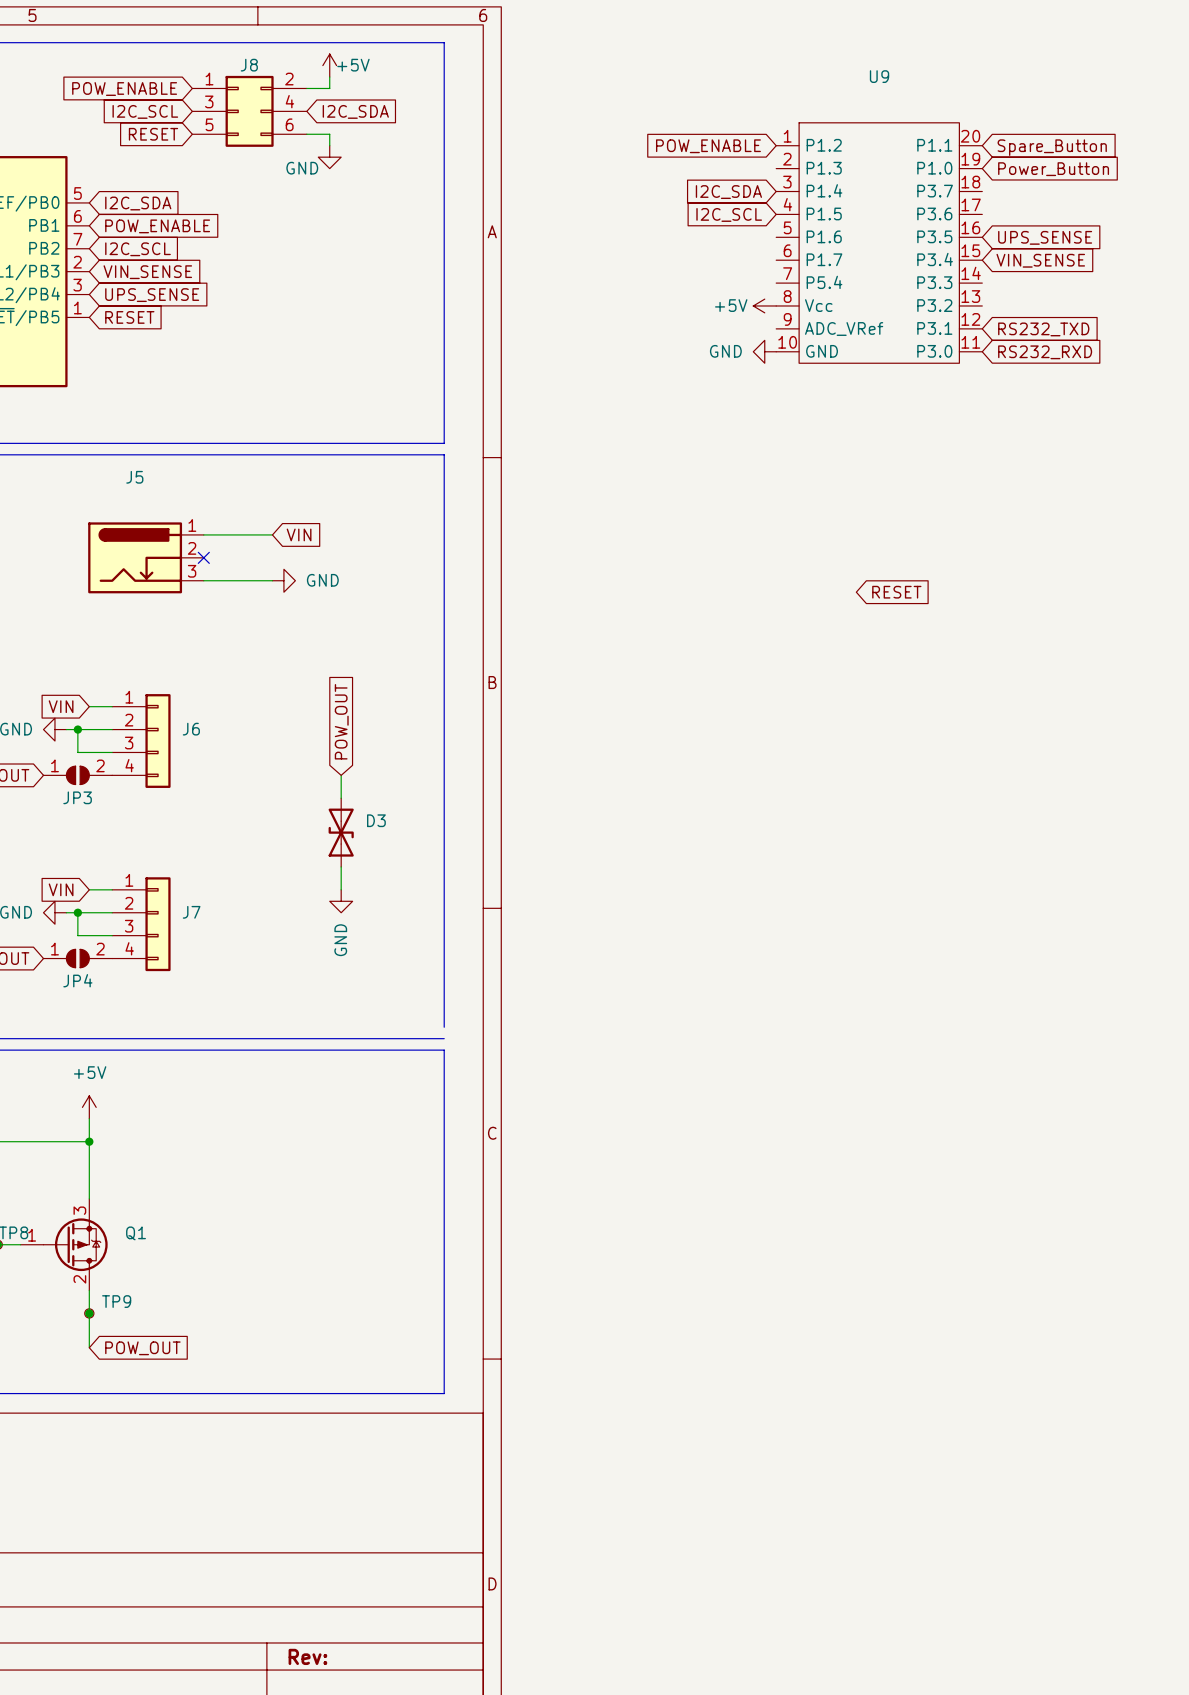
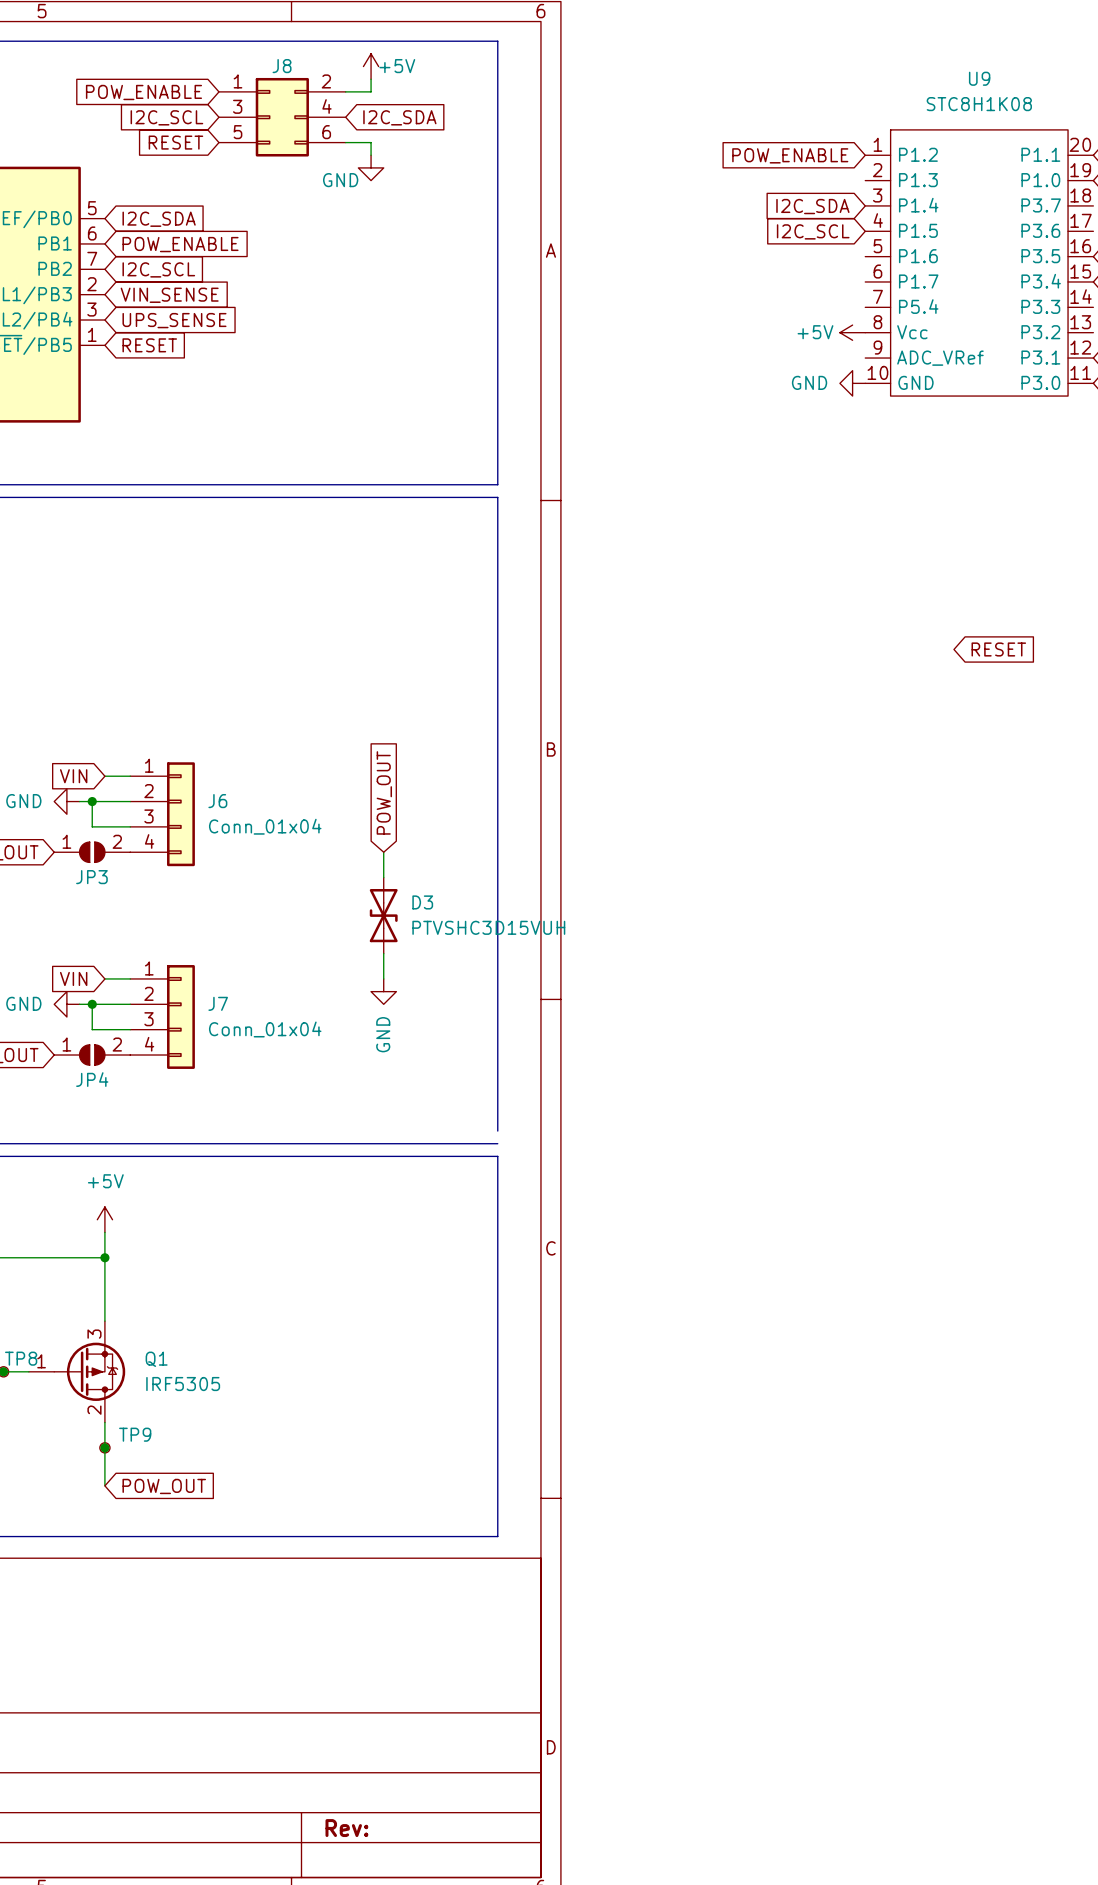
U9 value: none -> STC8H1K08 (979, 104)
wire: (203, 534) (272, 534) -> none
global label: VIN (299, 534) -> none
J5: (145, 557) -> none
no-connect mark: (203, 557) -> none
wire: (203, 580) (272, 580) -> none
power symbol: GND (283, 580) -> none
J6 value: none -> Conn_01x04 (265, 826)
D3 value: none -> PTVSHC3D15VUH (488, 927)
J7 value: none -> Conn_01x04 (265, 1029)
Q1 value: none -> IRF5305 (183, 1384)

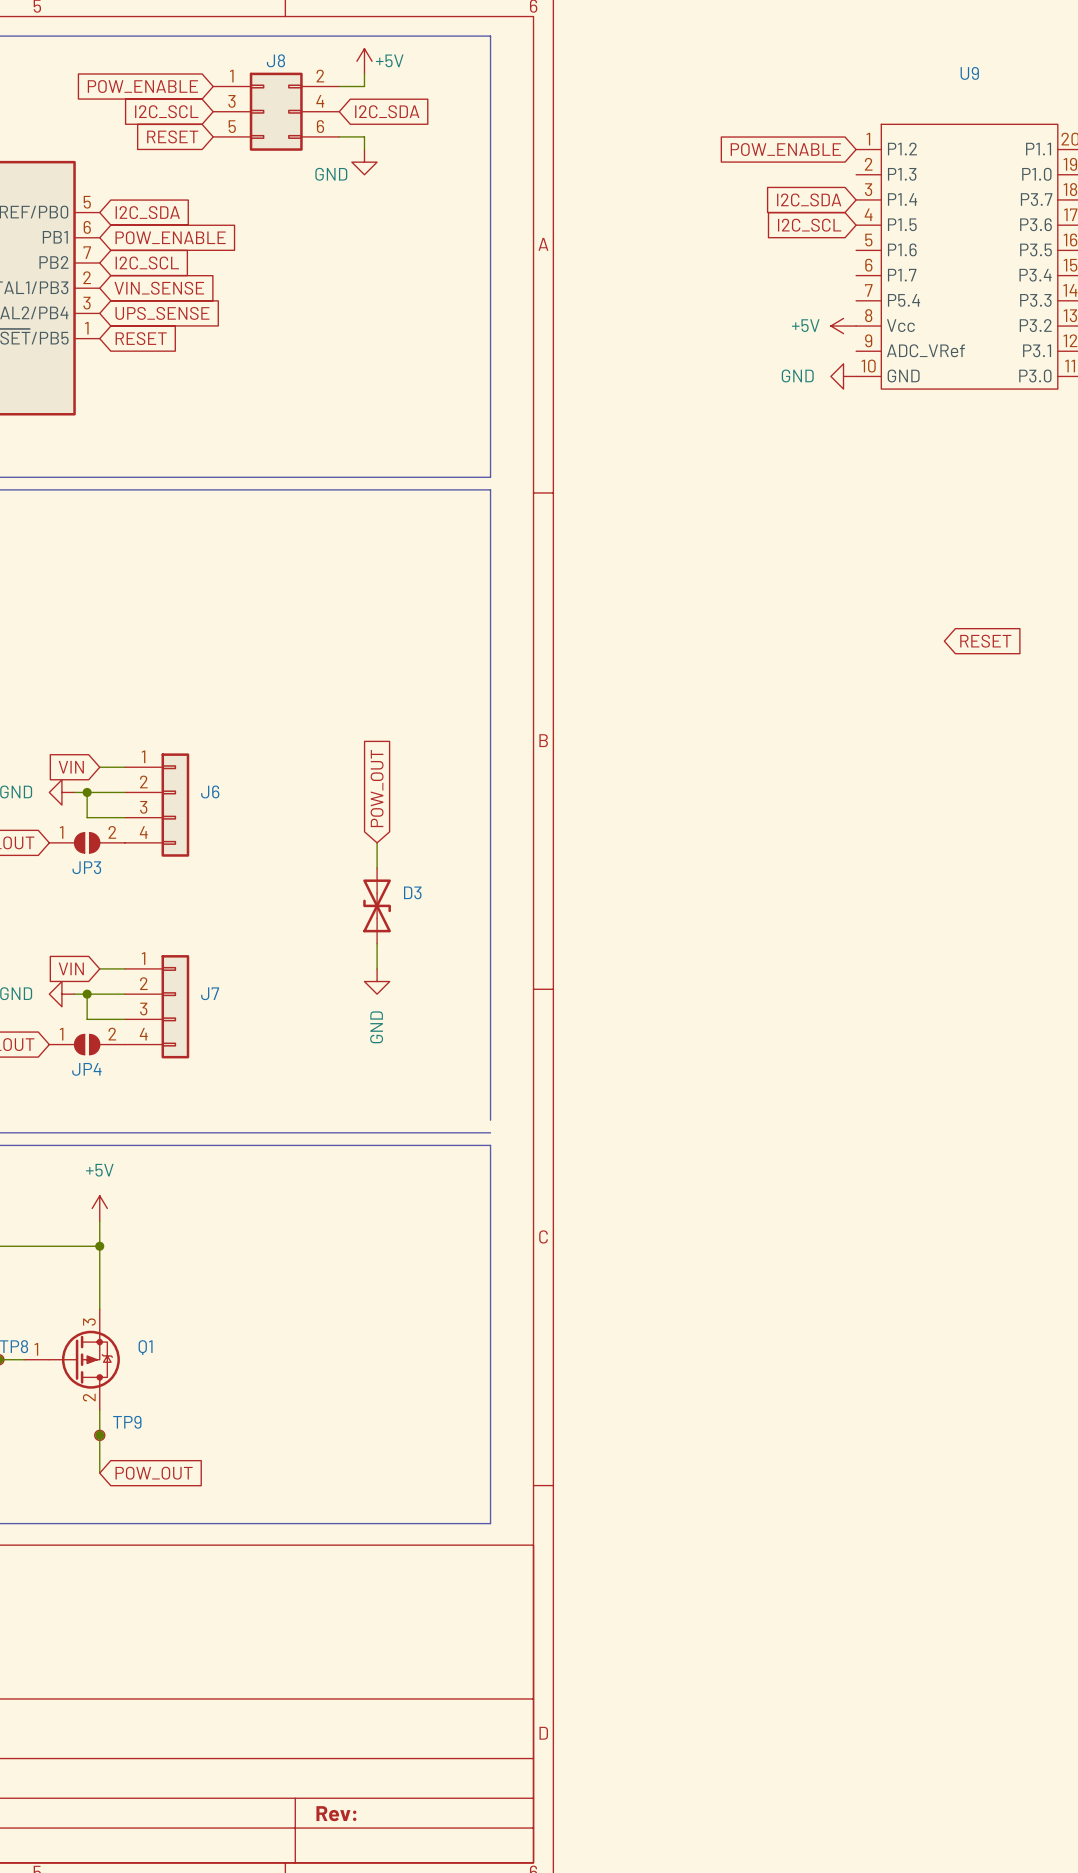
U9 value: STC8H1K08 (979, 104) -> none
J6 value: Conn_01x04 (265, 826) -> none
D3 value: PTVSHC3D15VUH (488, 927) -> none
J7 value: Conn_01x04 (265, 1029) -> none
Q1 value: IRF5305 (183, 1384) -> none

